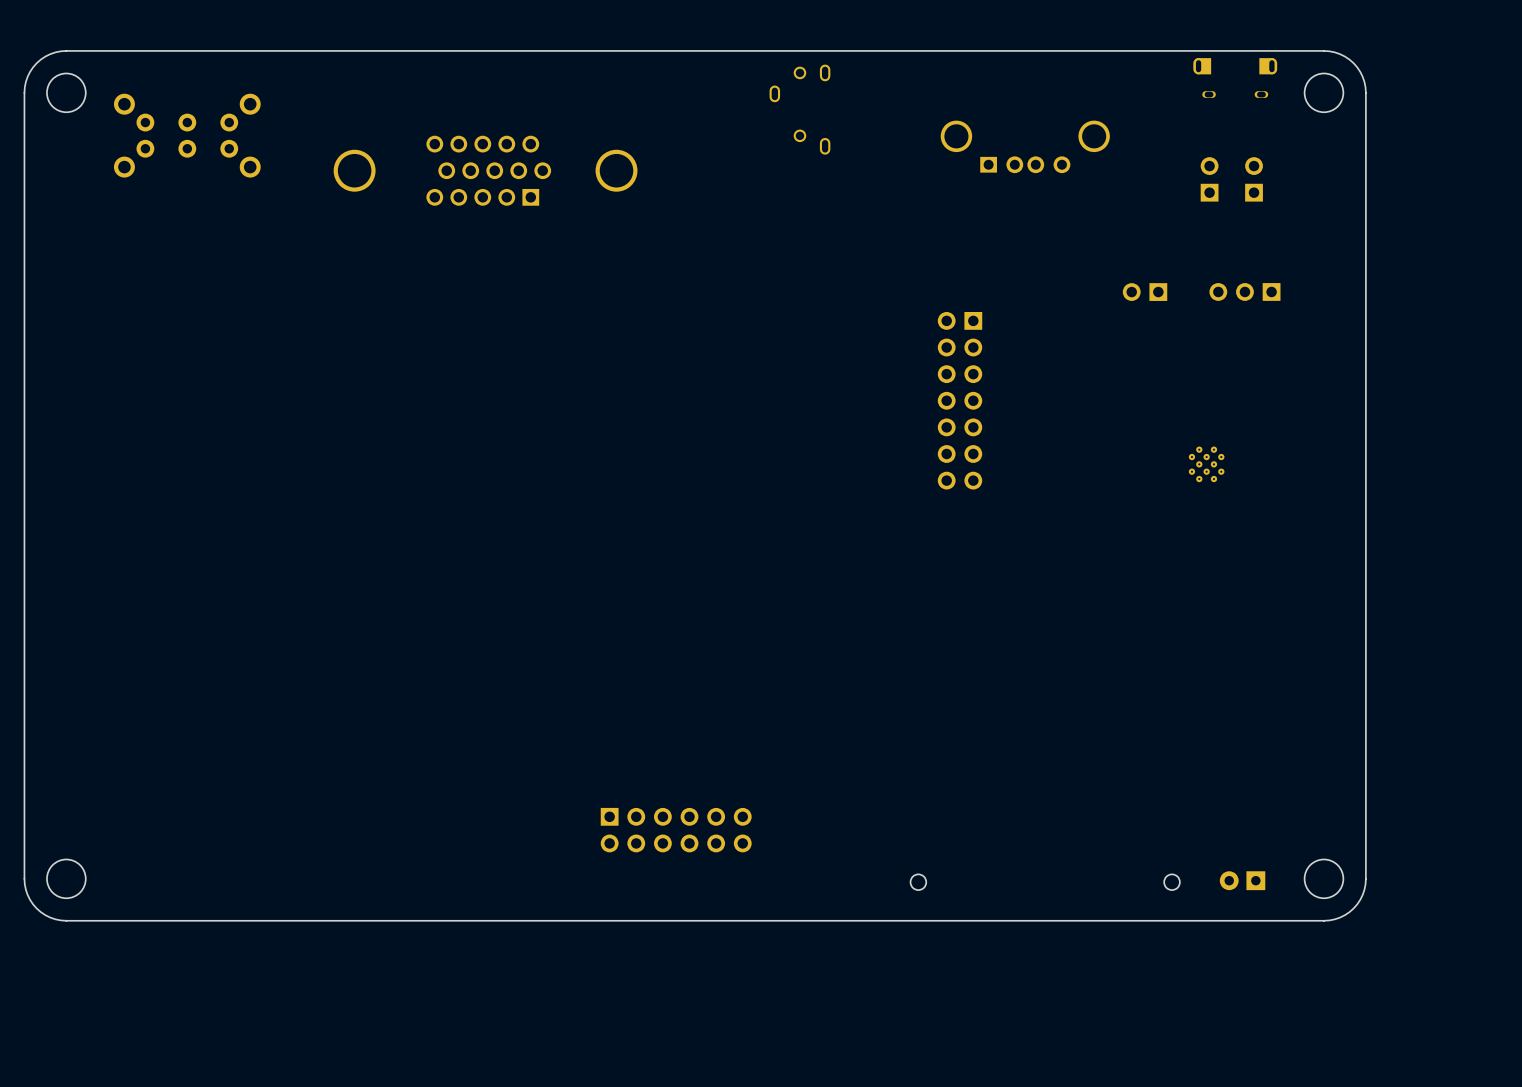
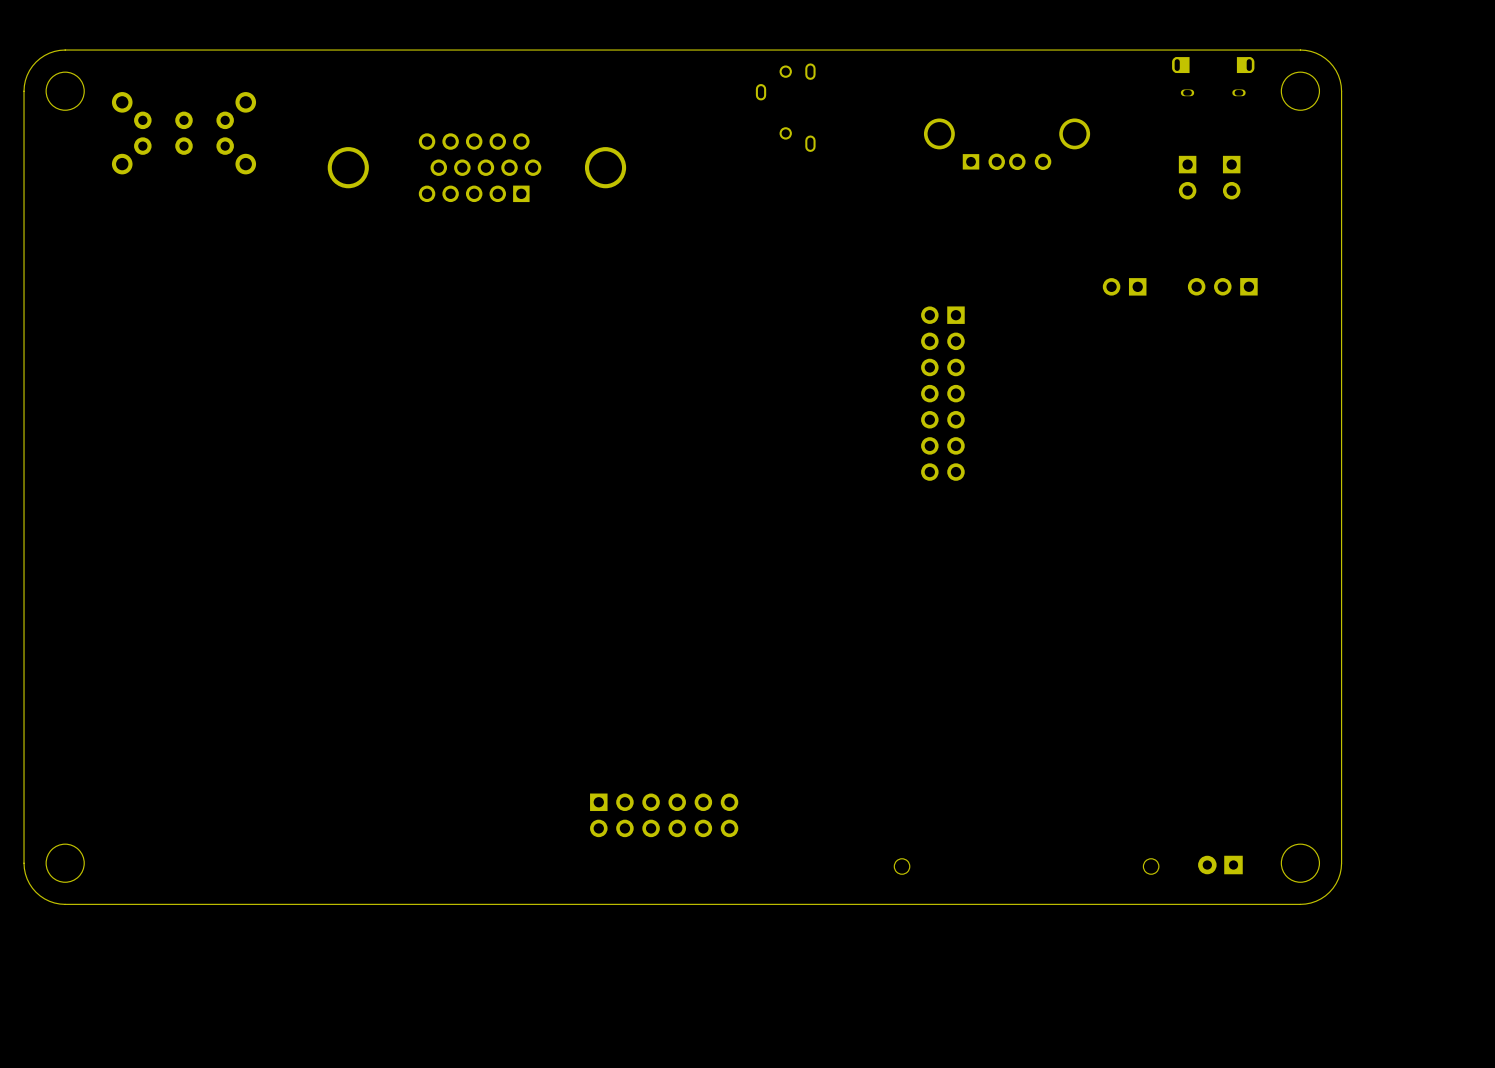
part rotation: 0° (1209, 179) -> 180° (1187, 177)
part rotation: 0° (1254, 179) -> 180° (1231, 177)
part: (1206, 464) -> none

